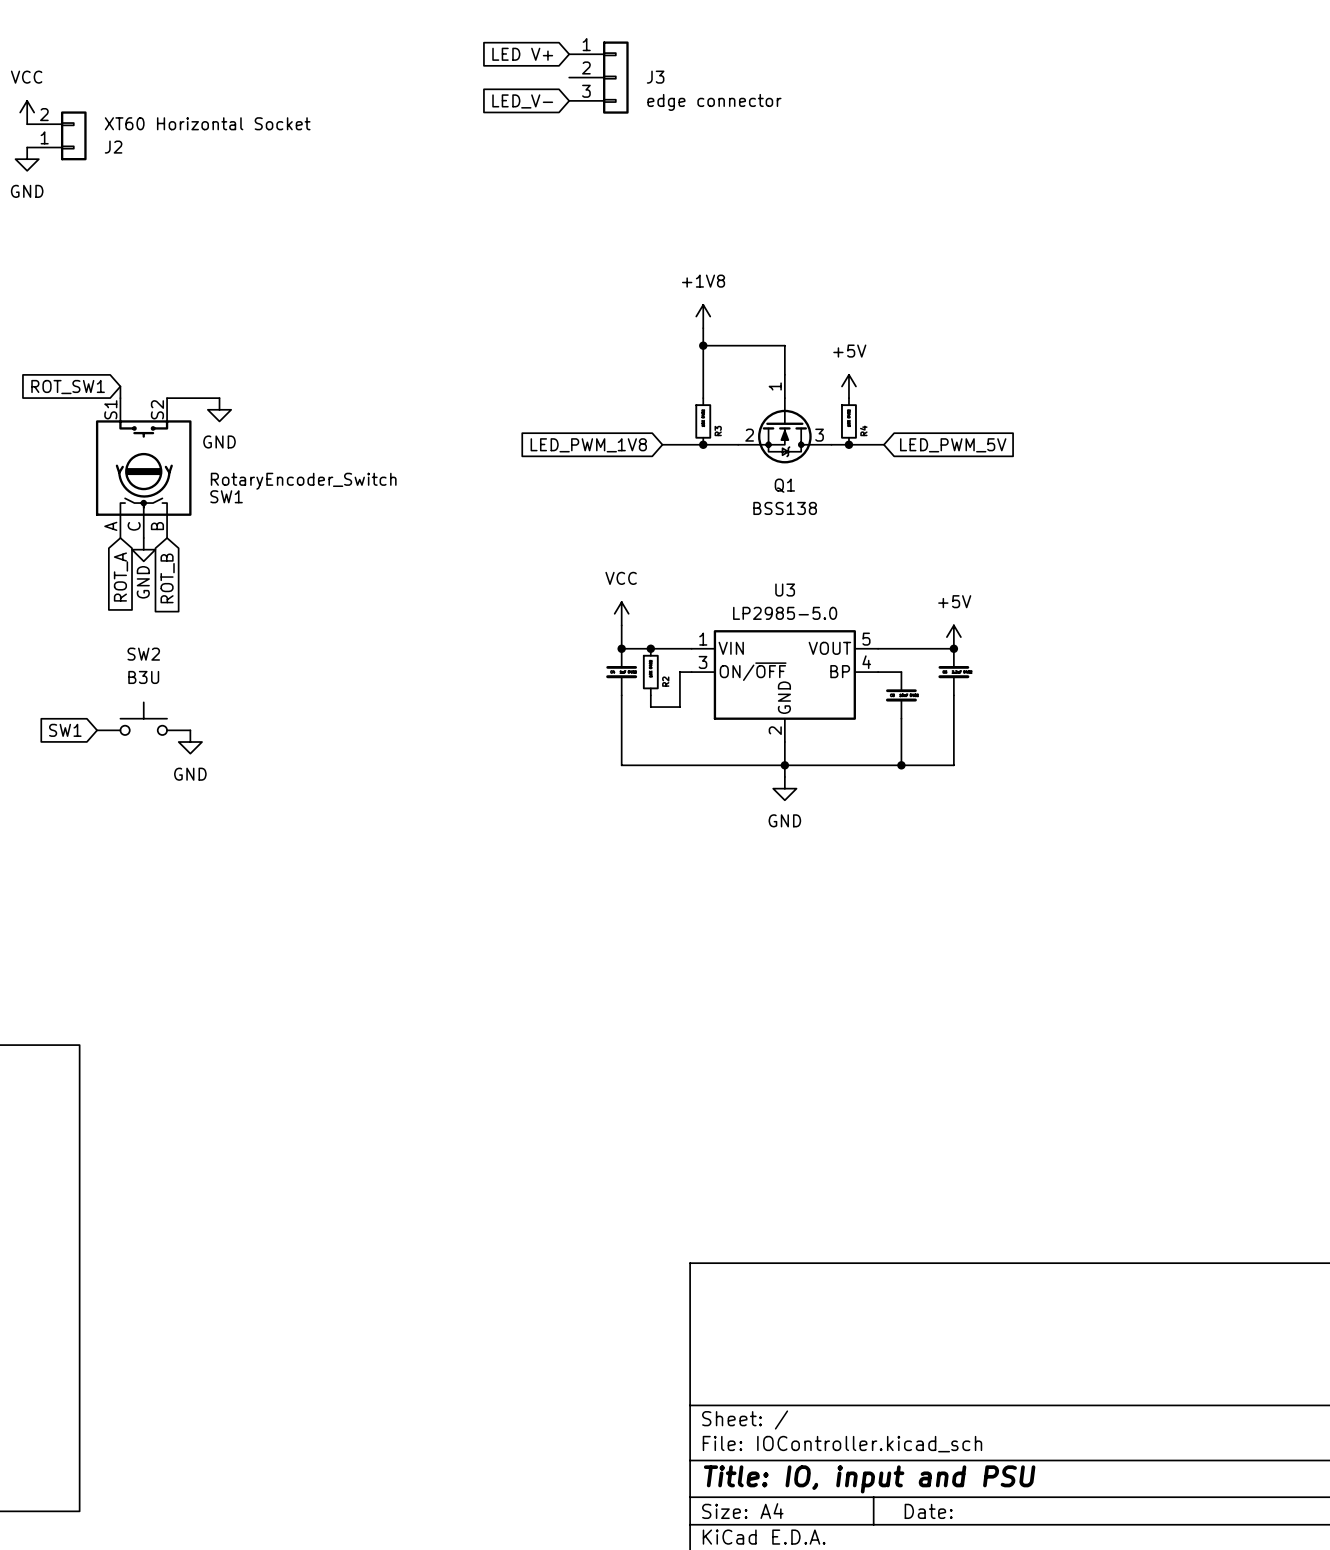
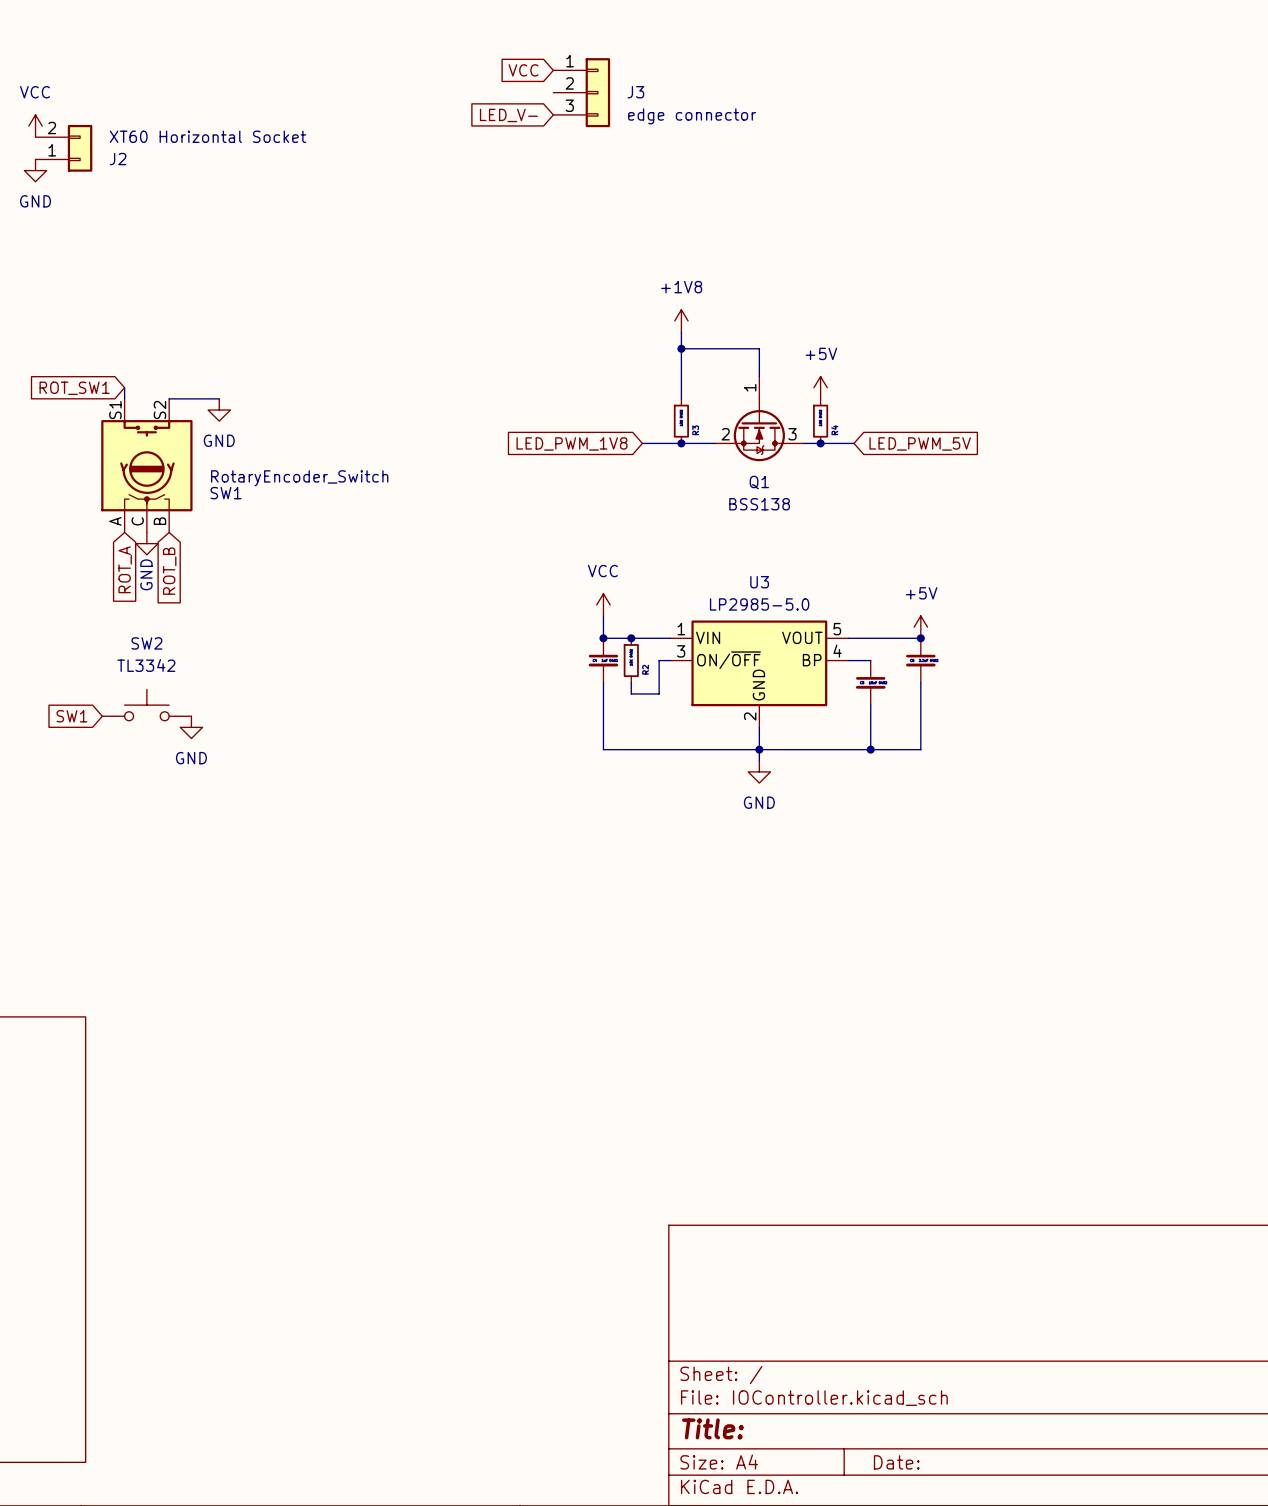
global label: LED V+ (522, 54) -> VCC (523, 70)
SW2 value: B3U (143, 677) -> TL3342 (146, 665)
title block: Title: IO, input and PSU (869, 1479) -> Title: (712, 1428)

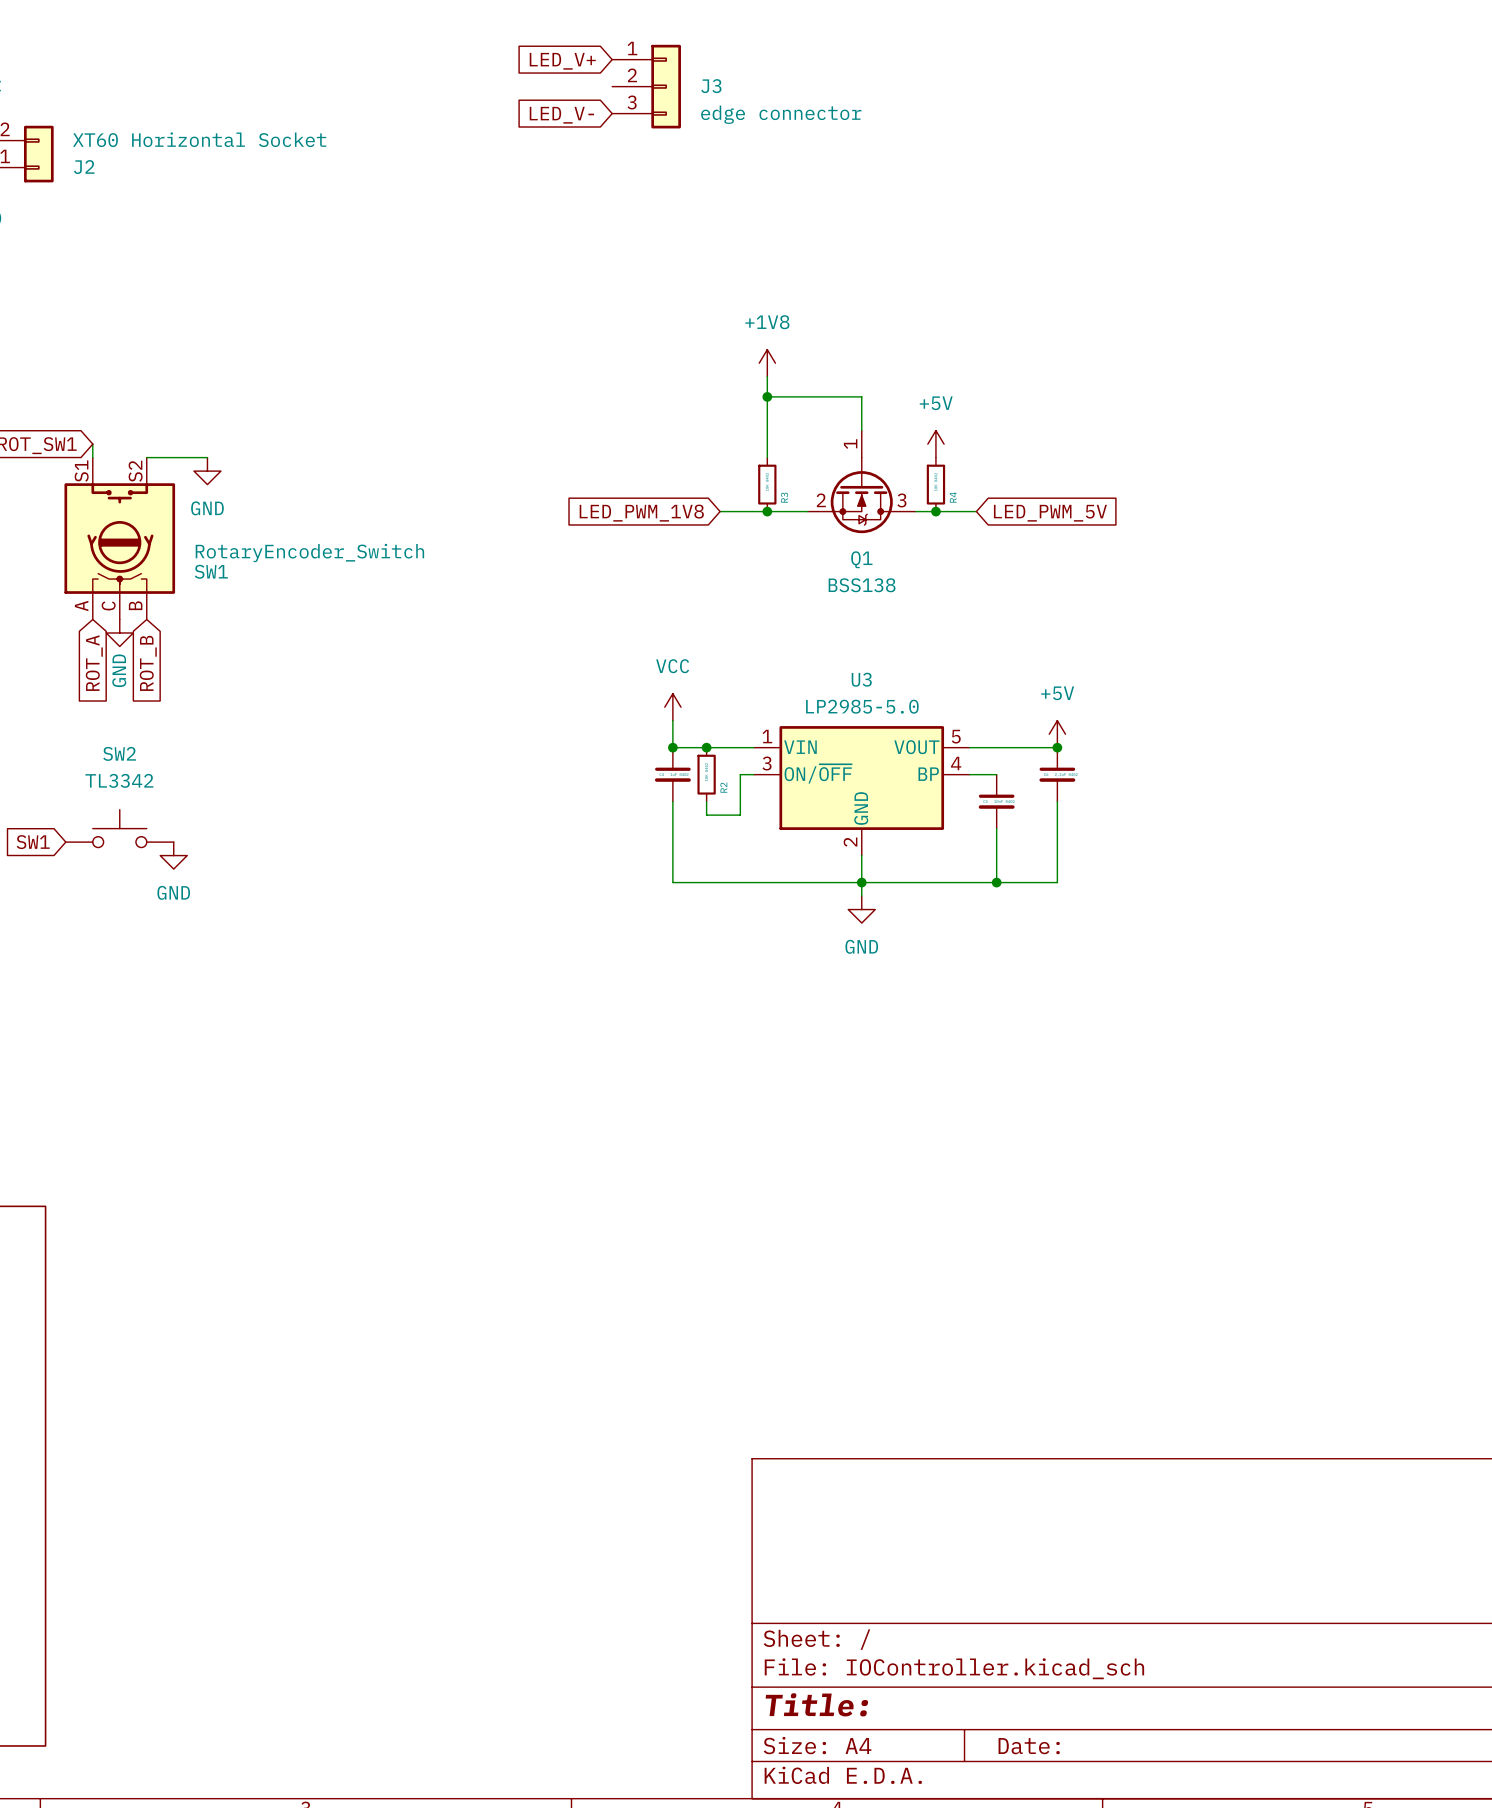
global label: VCC (523, 70) -> LED_V+ (562, 61)

